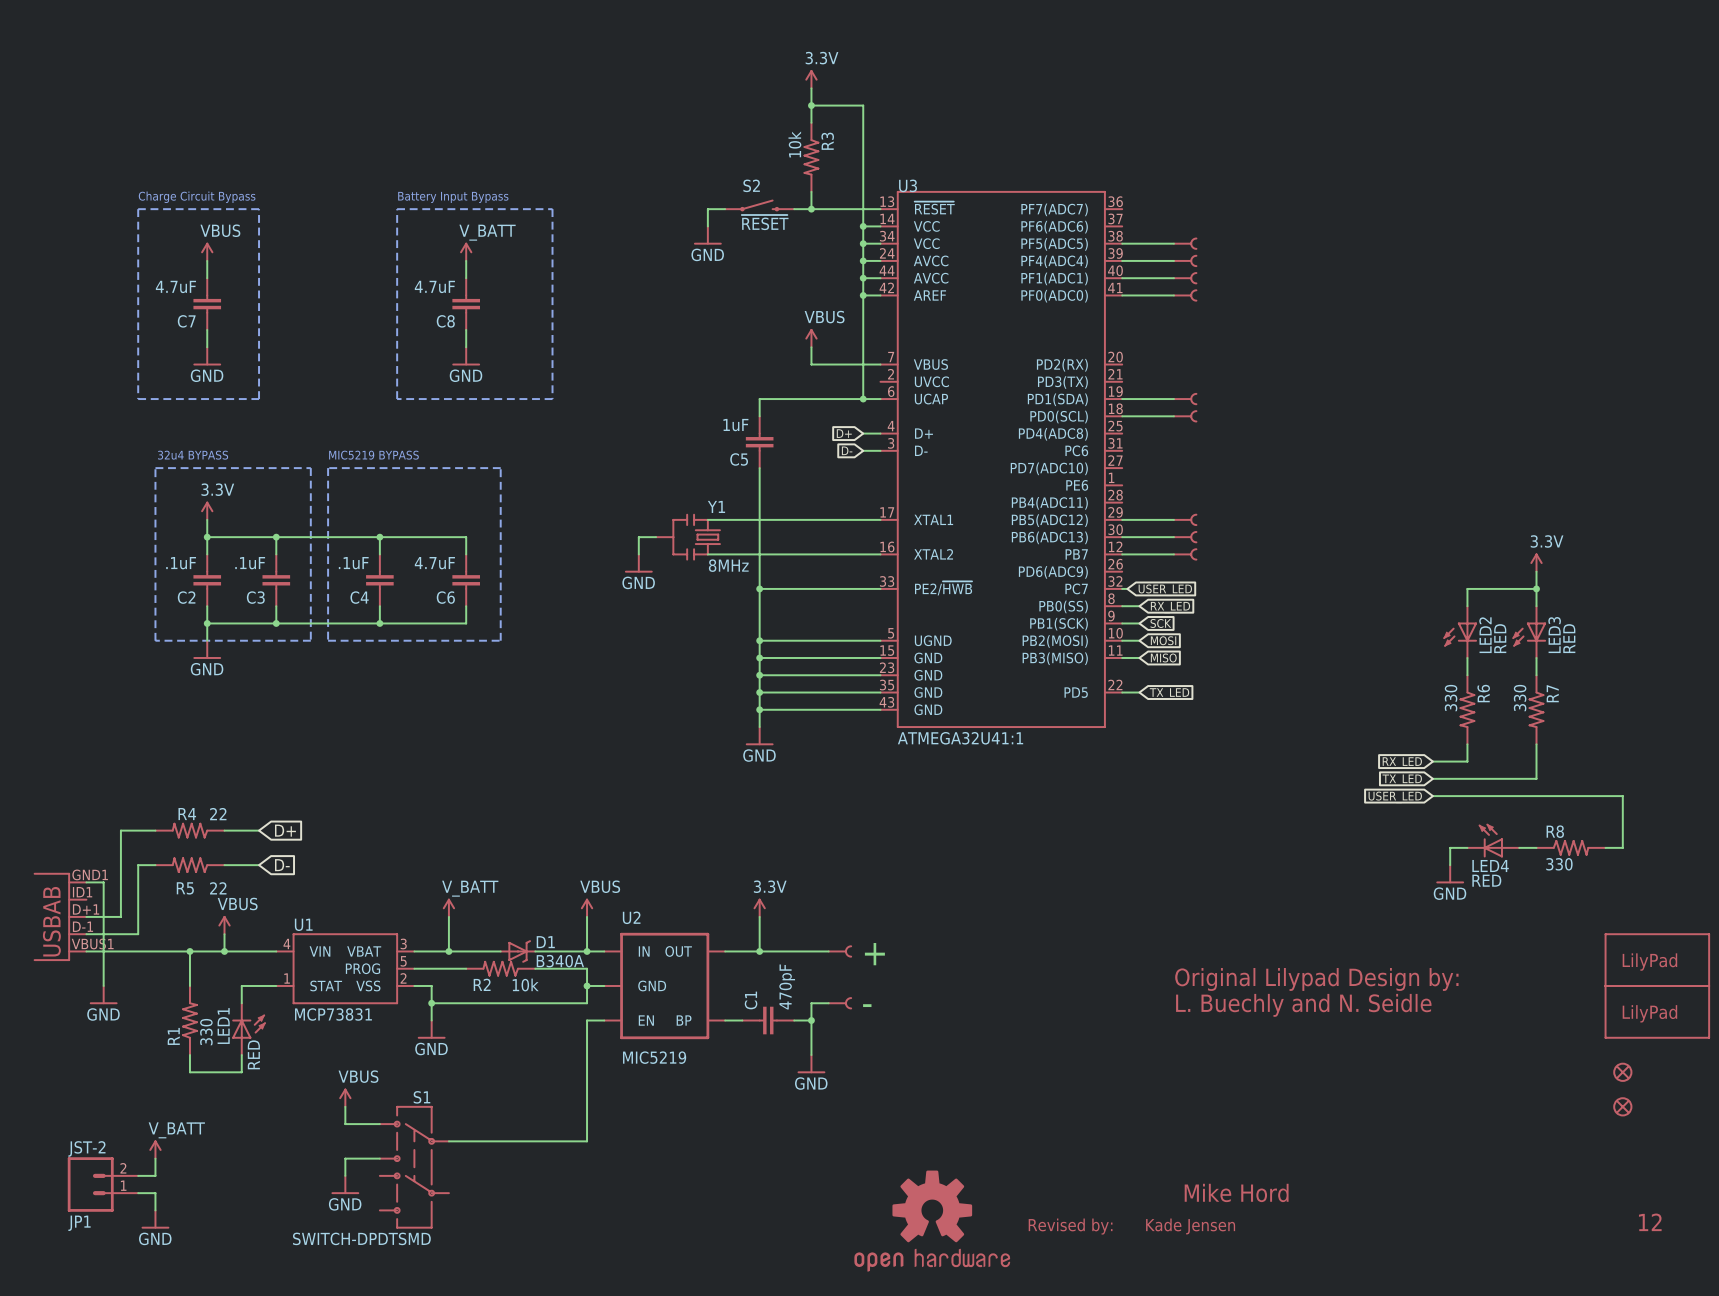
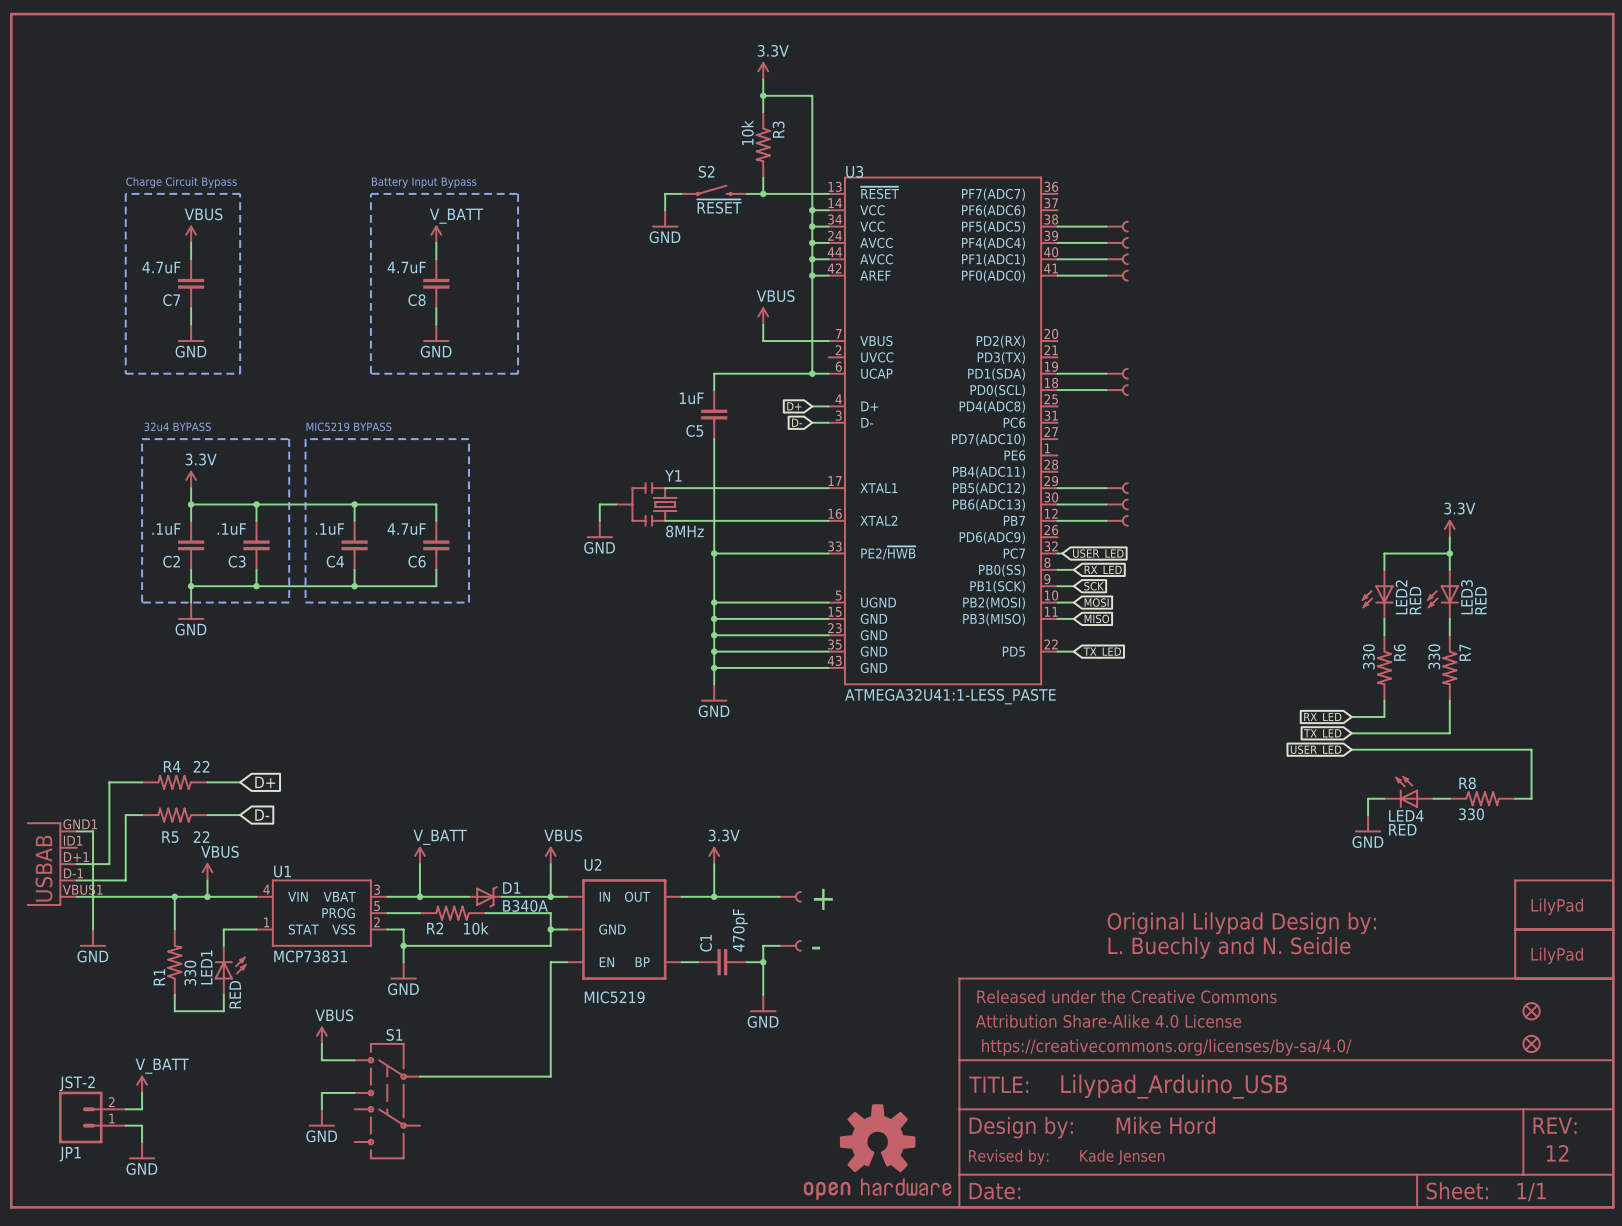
part: none -> (812, 610)
U3 value: ATMEGA32U41:1 (960, 738) -> ATMEGA32U41:1-LESS_PASTE (950, 696)
R2 position: (500, 968) -> (452, 913)
part: none -> (1286, 1092)
S1 value: SWITCH-DPDTSMD (361, 1238) -> none

